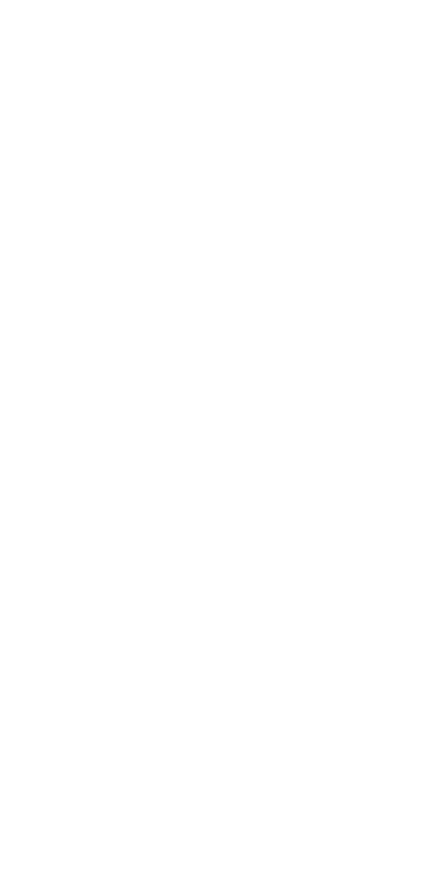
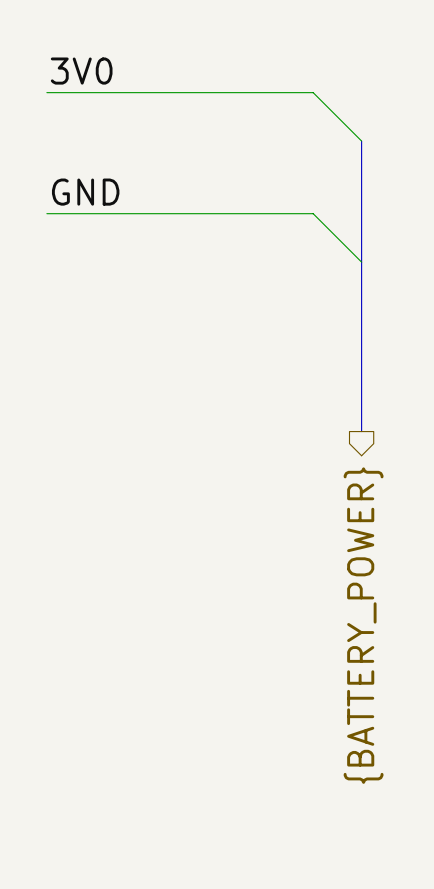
label: none -> 3V0 (81, 71)
wire: none -> (46, 92) (313, 92) (361, 141)
bus: none -> (361, 141) (361, 431)
label: none -> GND (85, 192)
wire: none -> (46, 213) (313, 213) (361, 262)
hierarchical label: none -> {BATTERY_POWER} (363, 625)

